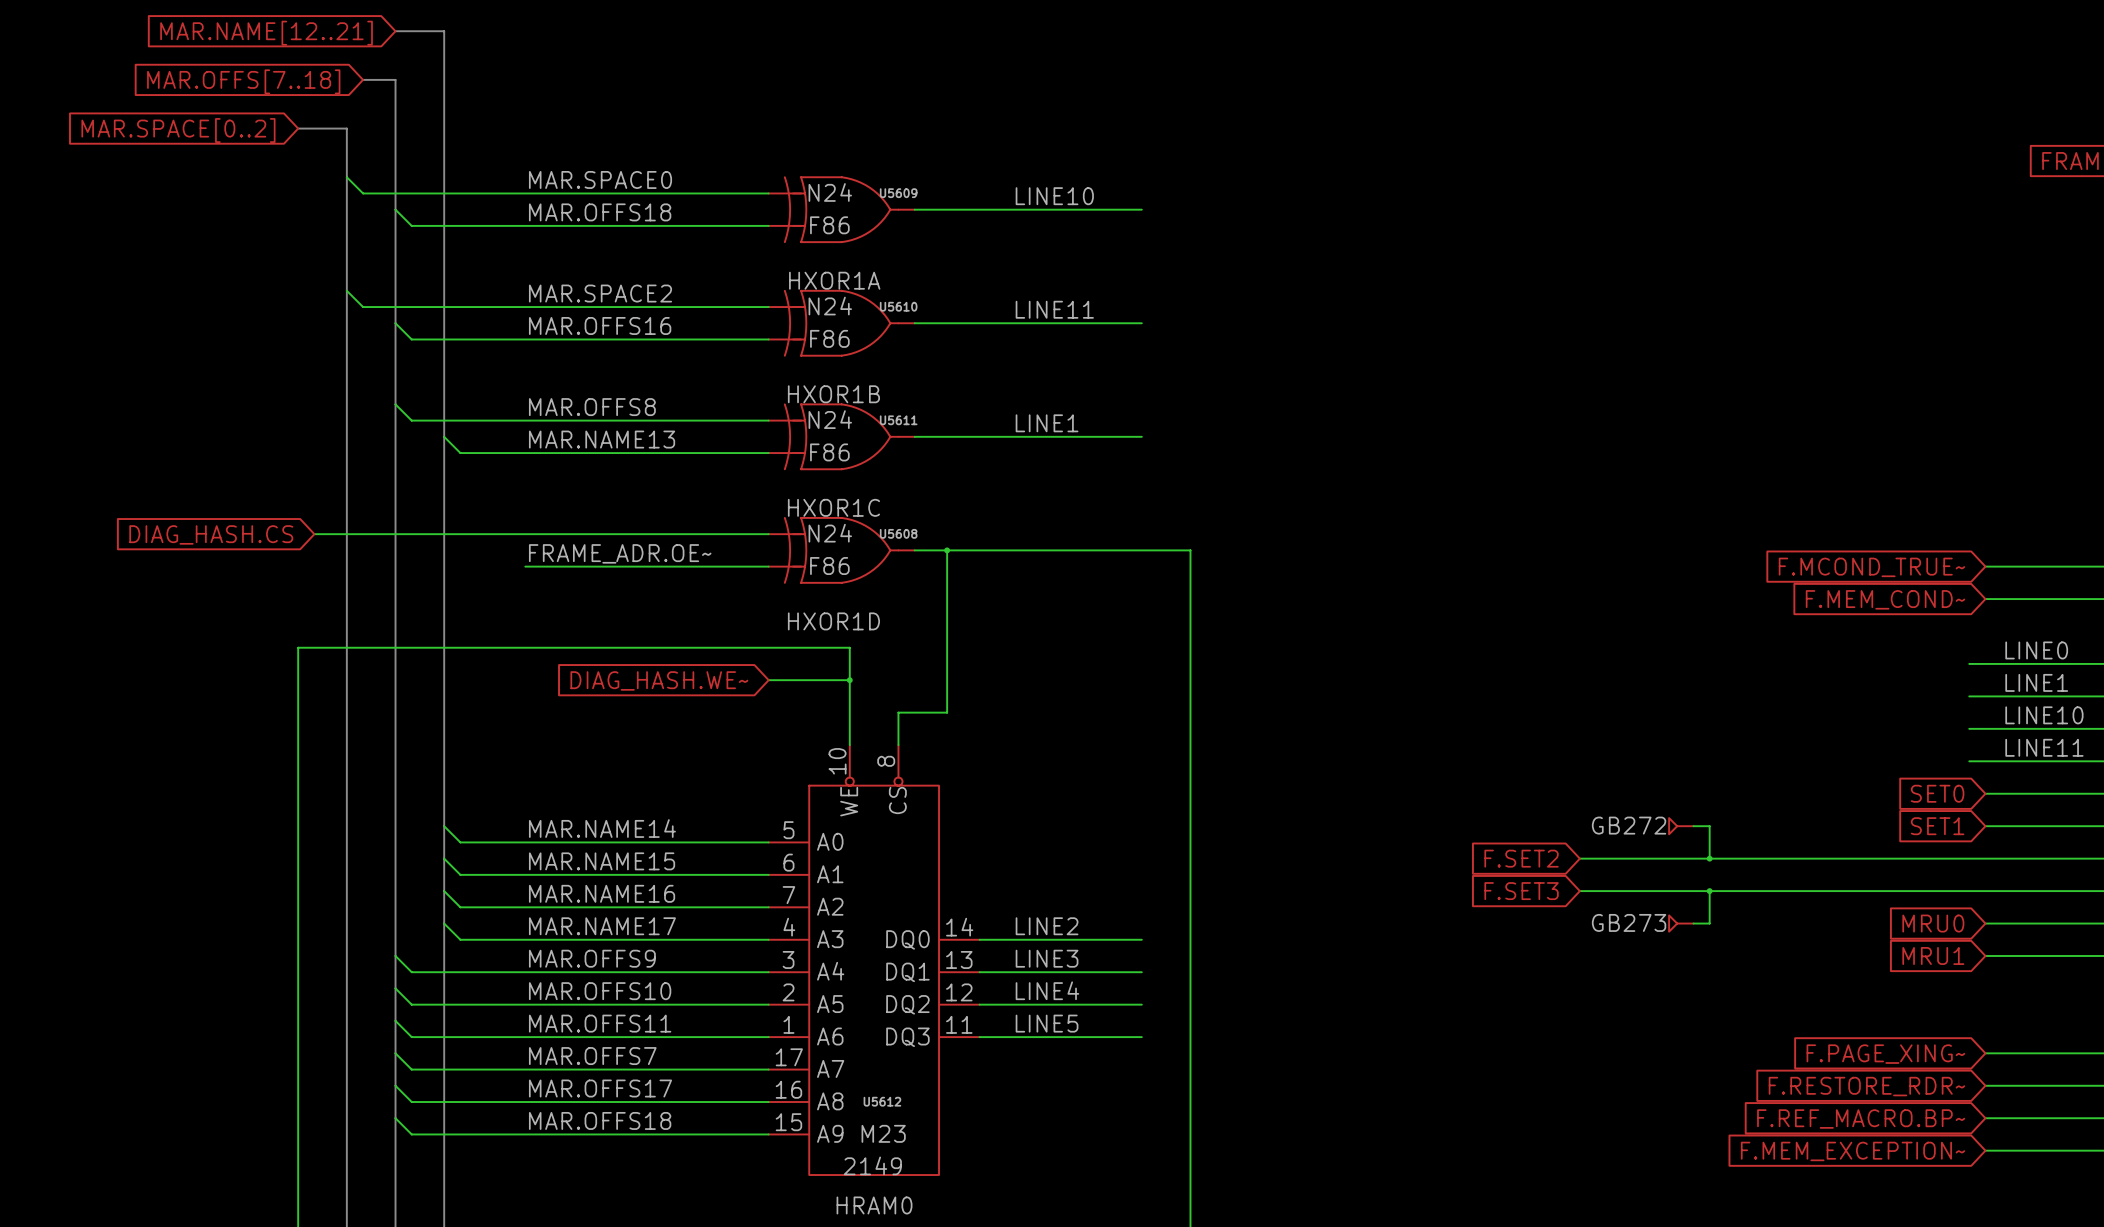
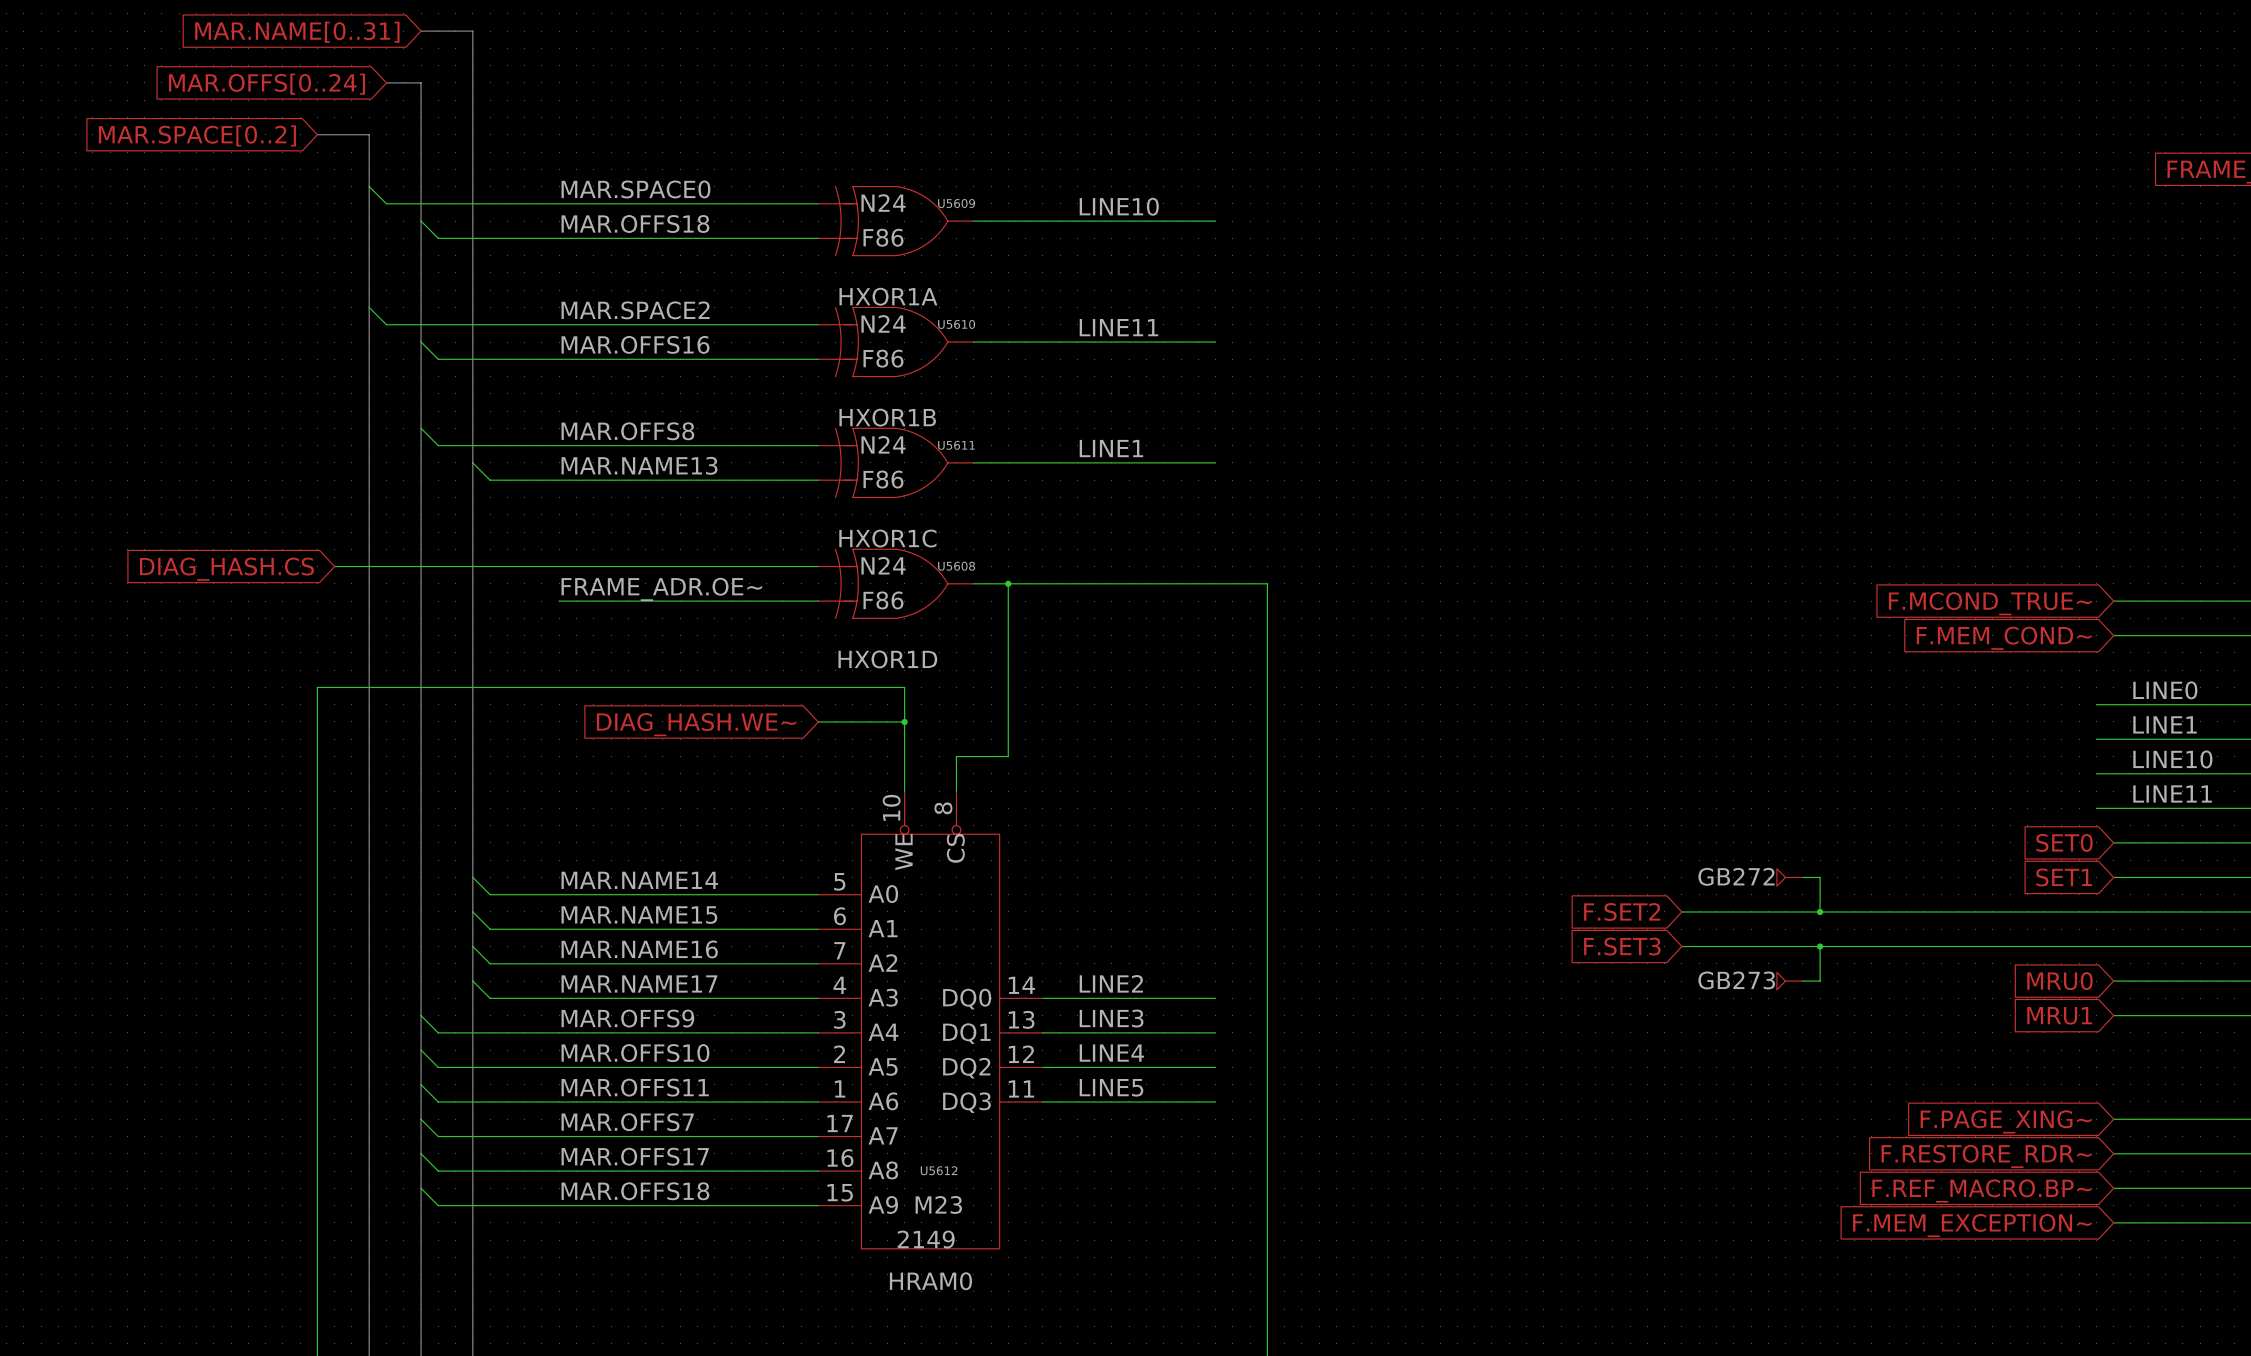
global label: MAR.NAME[12..21] (266, 33) -> MAR.NAME[0..31] (297, 32)
global label: MAR.OFFS[7..18] (243, 81) -> MAR.OFFS[0..24] (267, 84)

